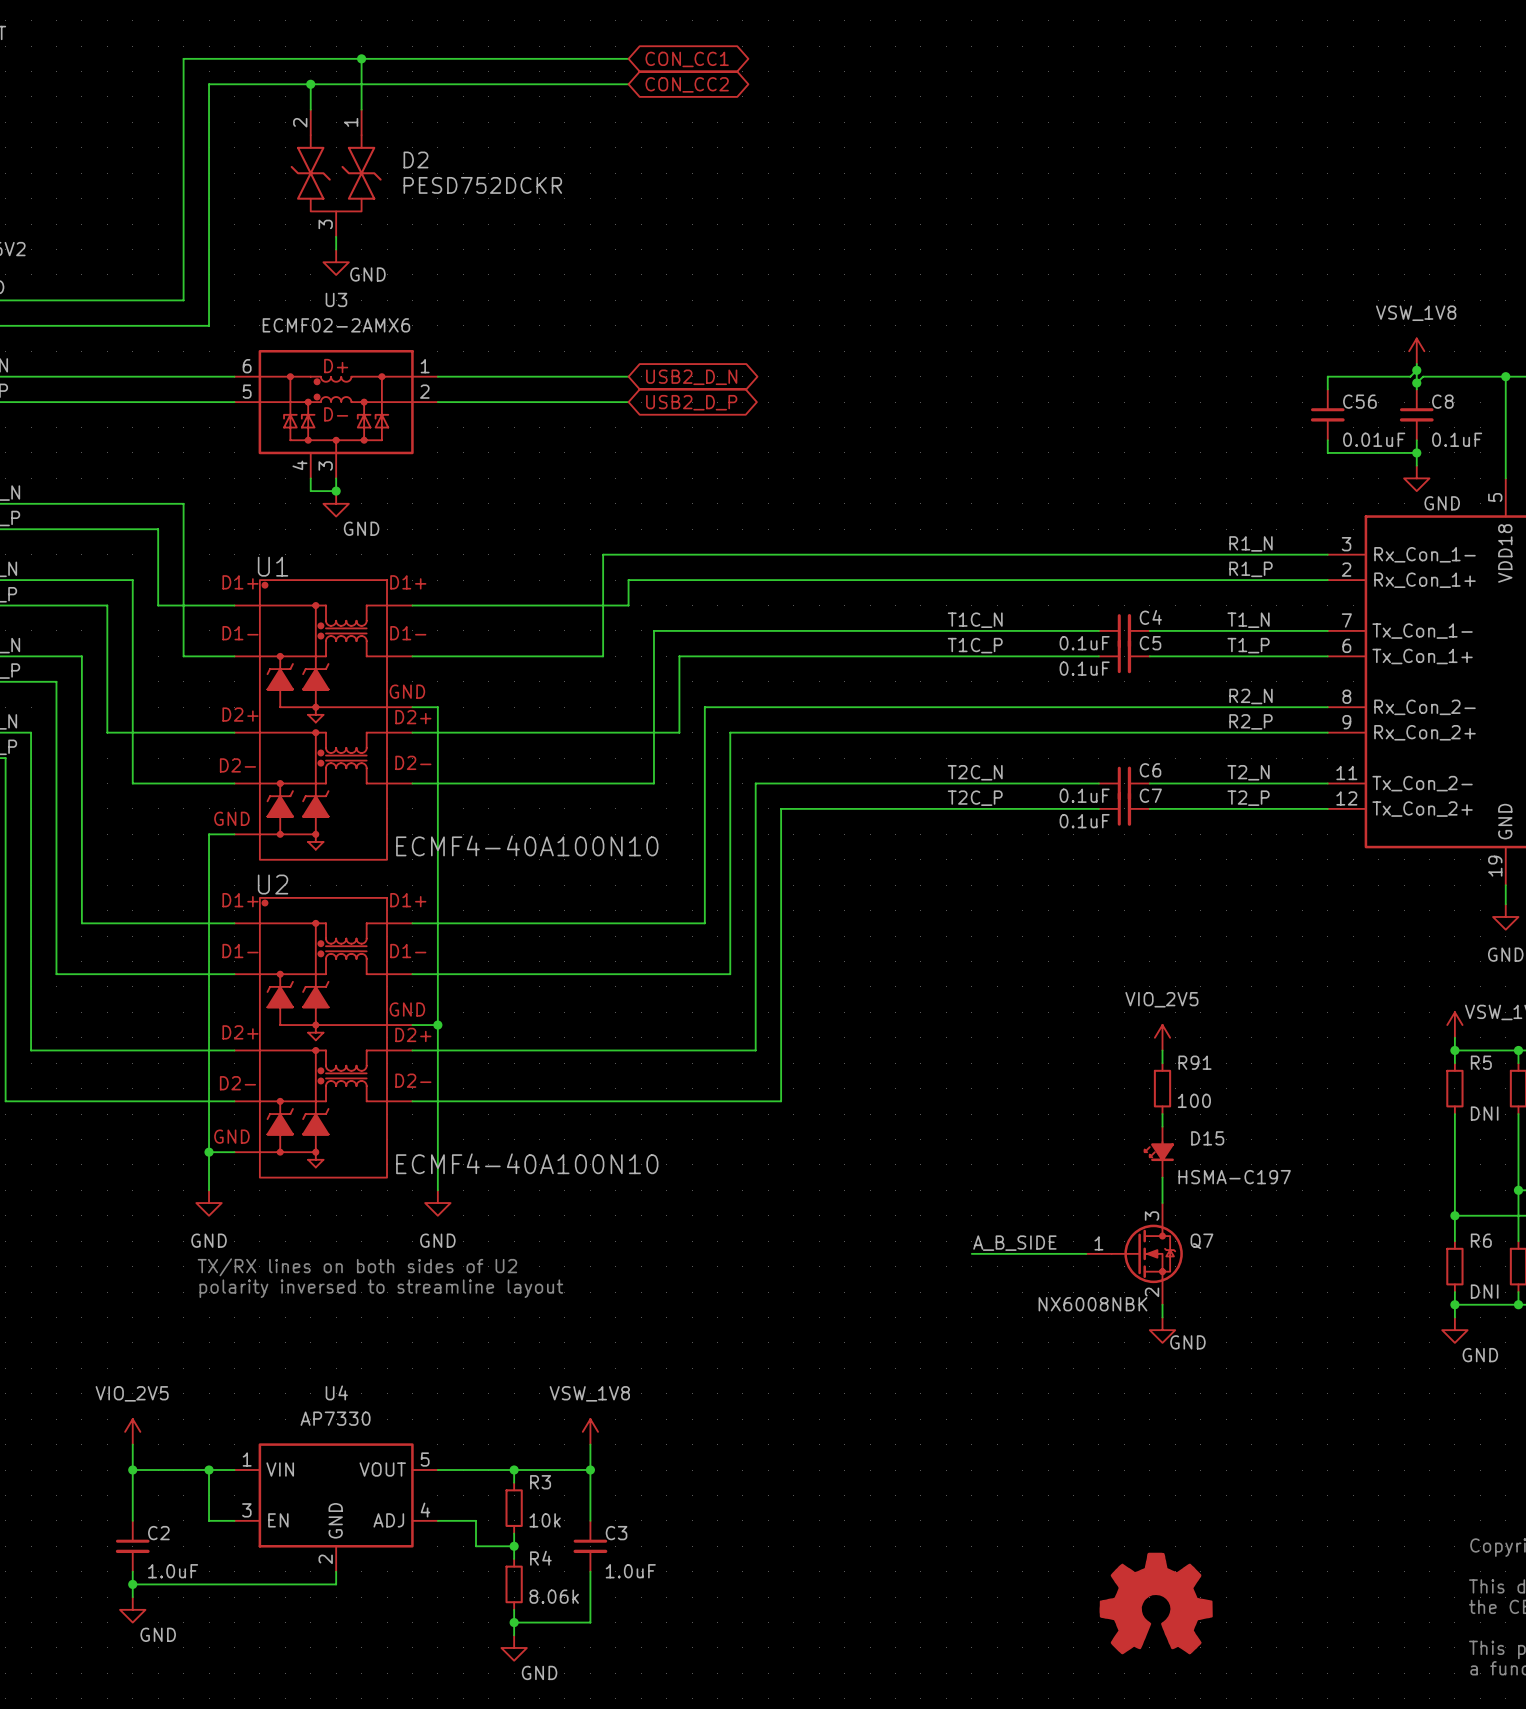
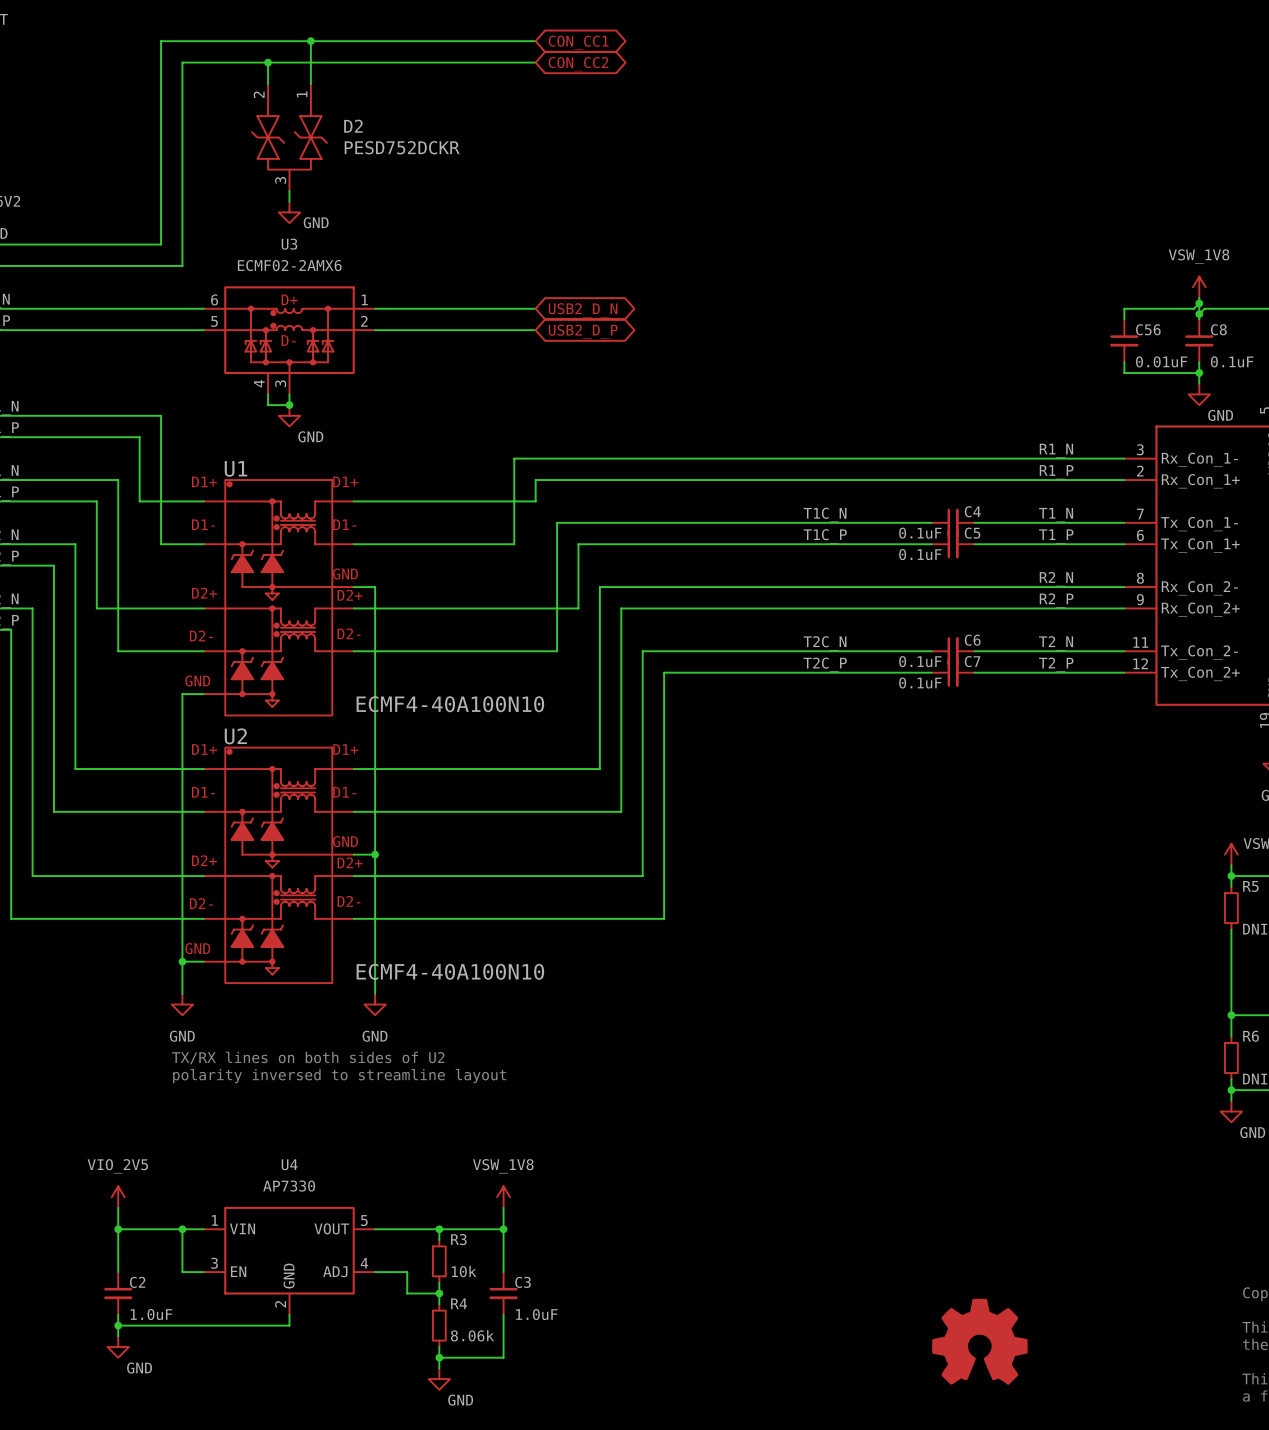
power symbol: VIO_2V5 (1162, 1037) -> none
wire: (1162, 1050) (1162, 1063) -> none
R91: 100 (1162, 1088) -> none
wire: (1162, 1114) (1162, 1126) -> none
D15: HSMA-C197 (1159, 1152) -> none
wire: (1162, 1177) (1162, 1203) -> none
label: A_B_SIDE (1014, 1243) -> none
wire: (971, 1253) (1086, 1253) -> none
Q7: NX6008NBK (1134, 1253) -> none
wire: (1162, 1304) (1162, 1317) -> none
power symbol: GND (1162, 1330) -> none

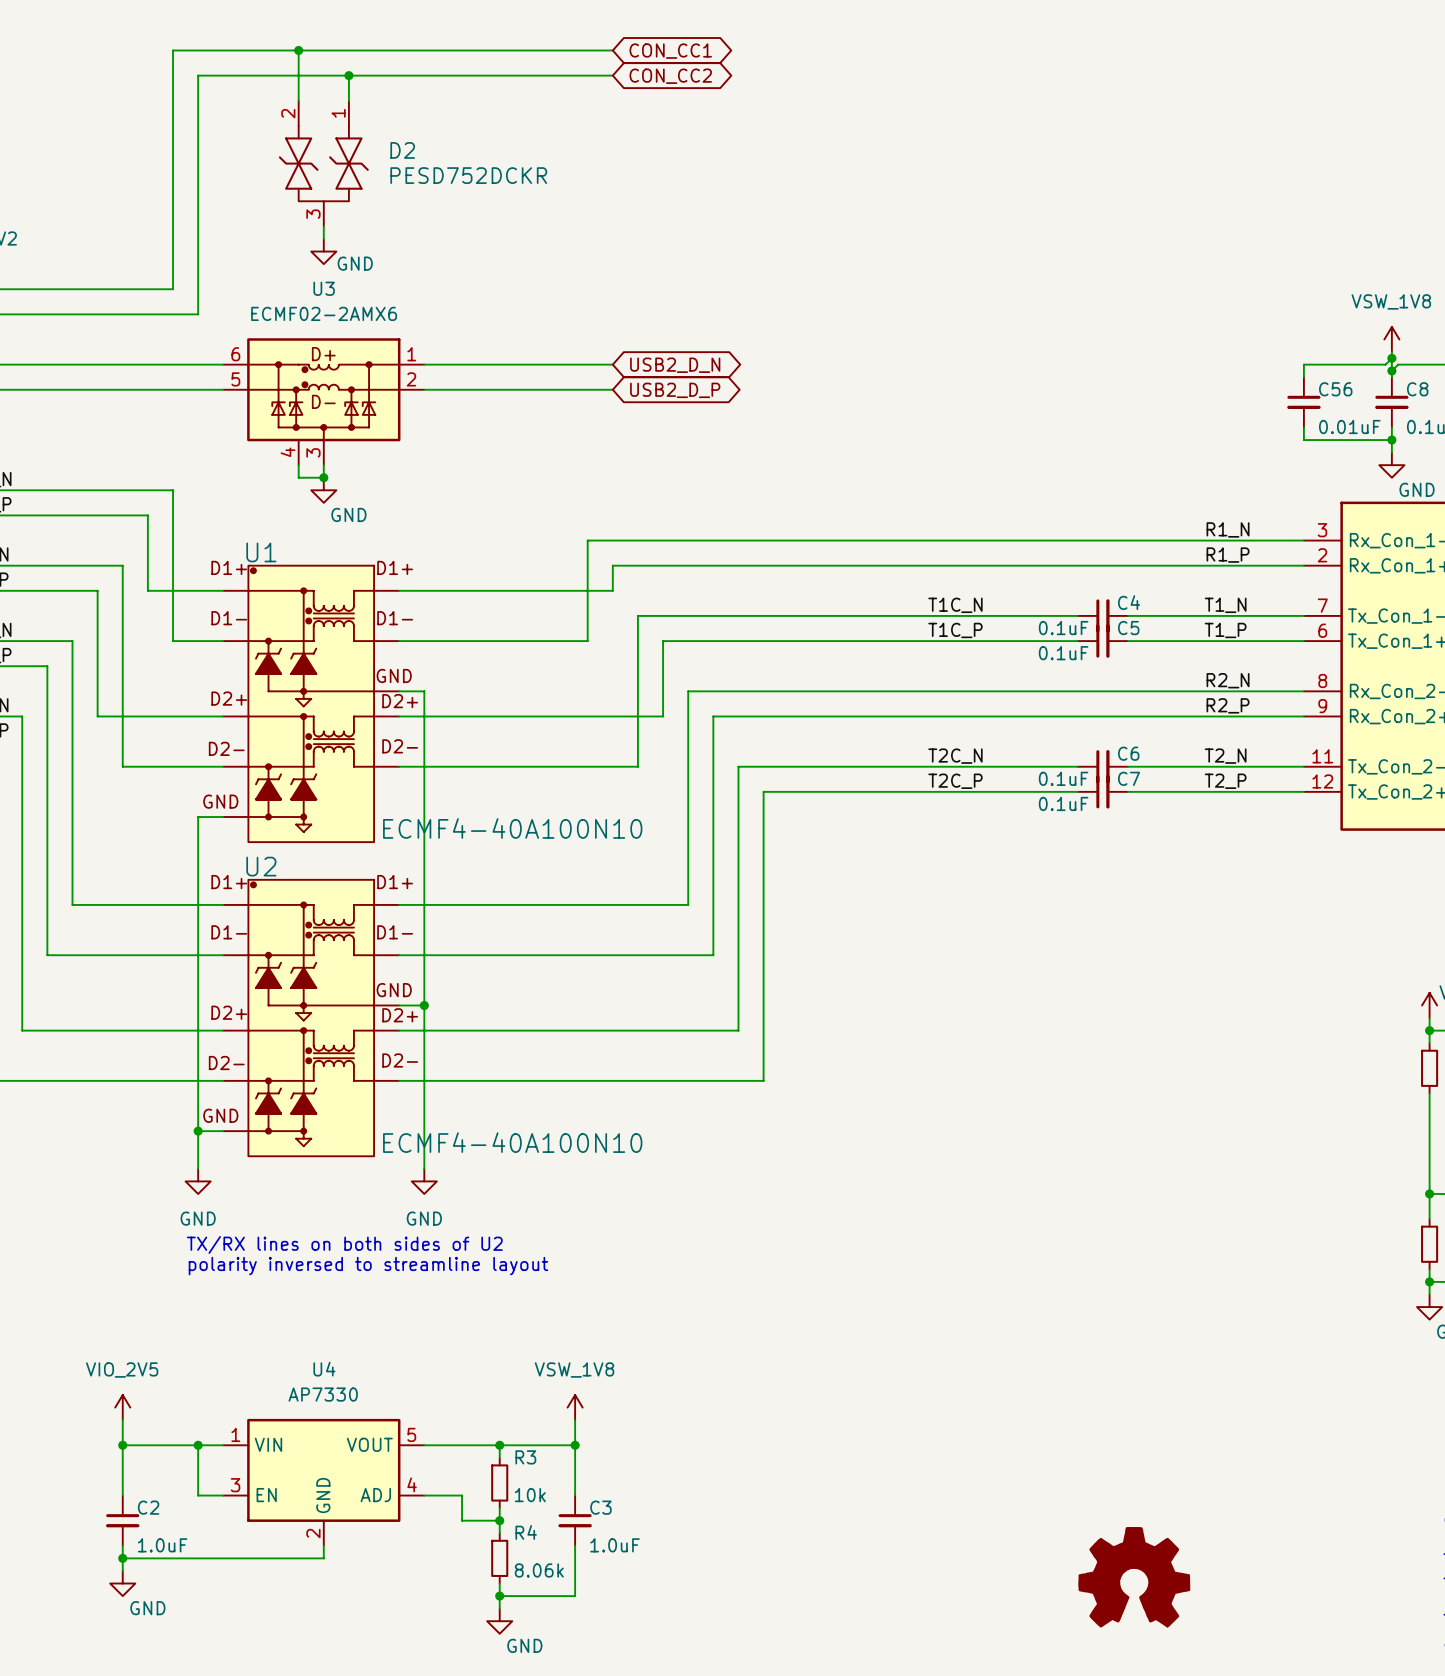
junction: none -> (298, 50)
wire: (310, 41) (310, 62) -> (298, 50) (298, 75)
junction: (310, 41) -> none
junction: (268, 62) -> none
junction: none -> (348, 75)

